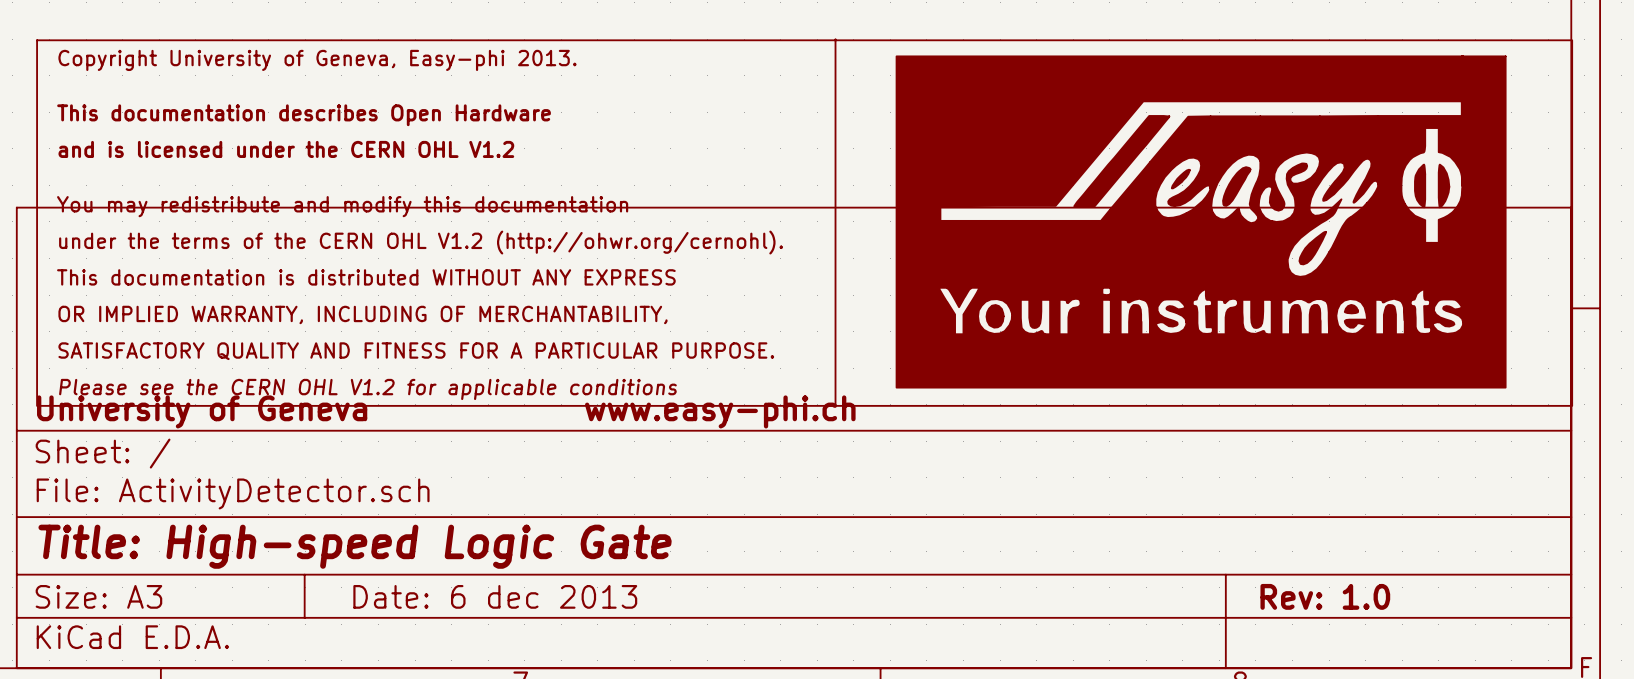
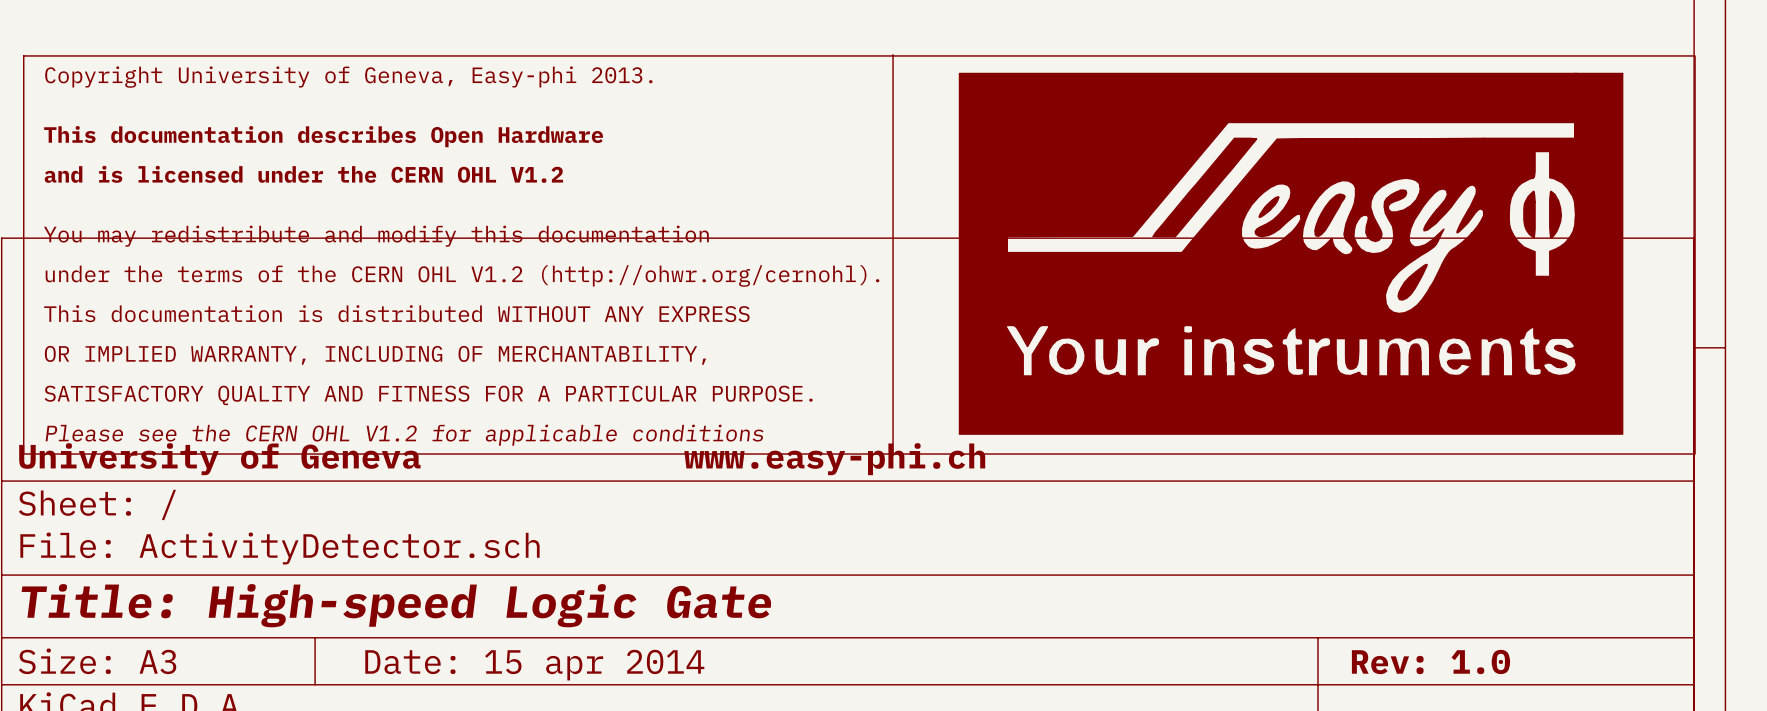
title block: Date: 6 dec 2013 (495, 596) -> Date: 15 apr 2014 (534, 665)

